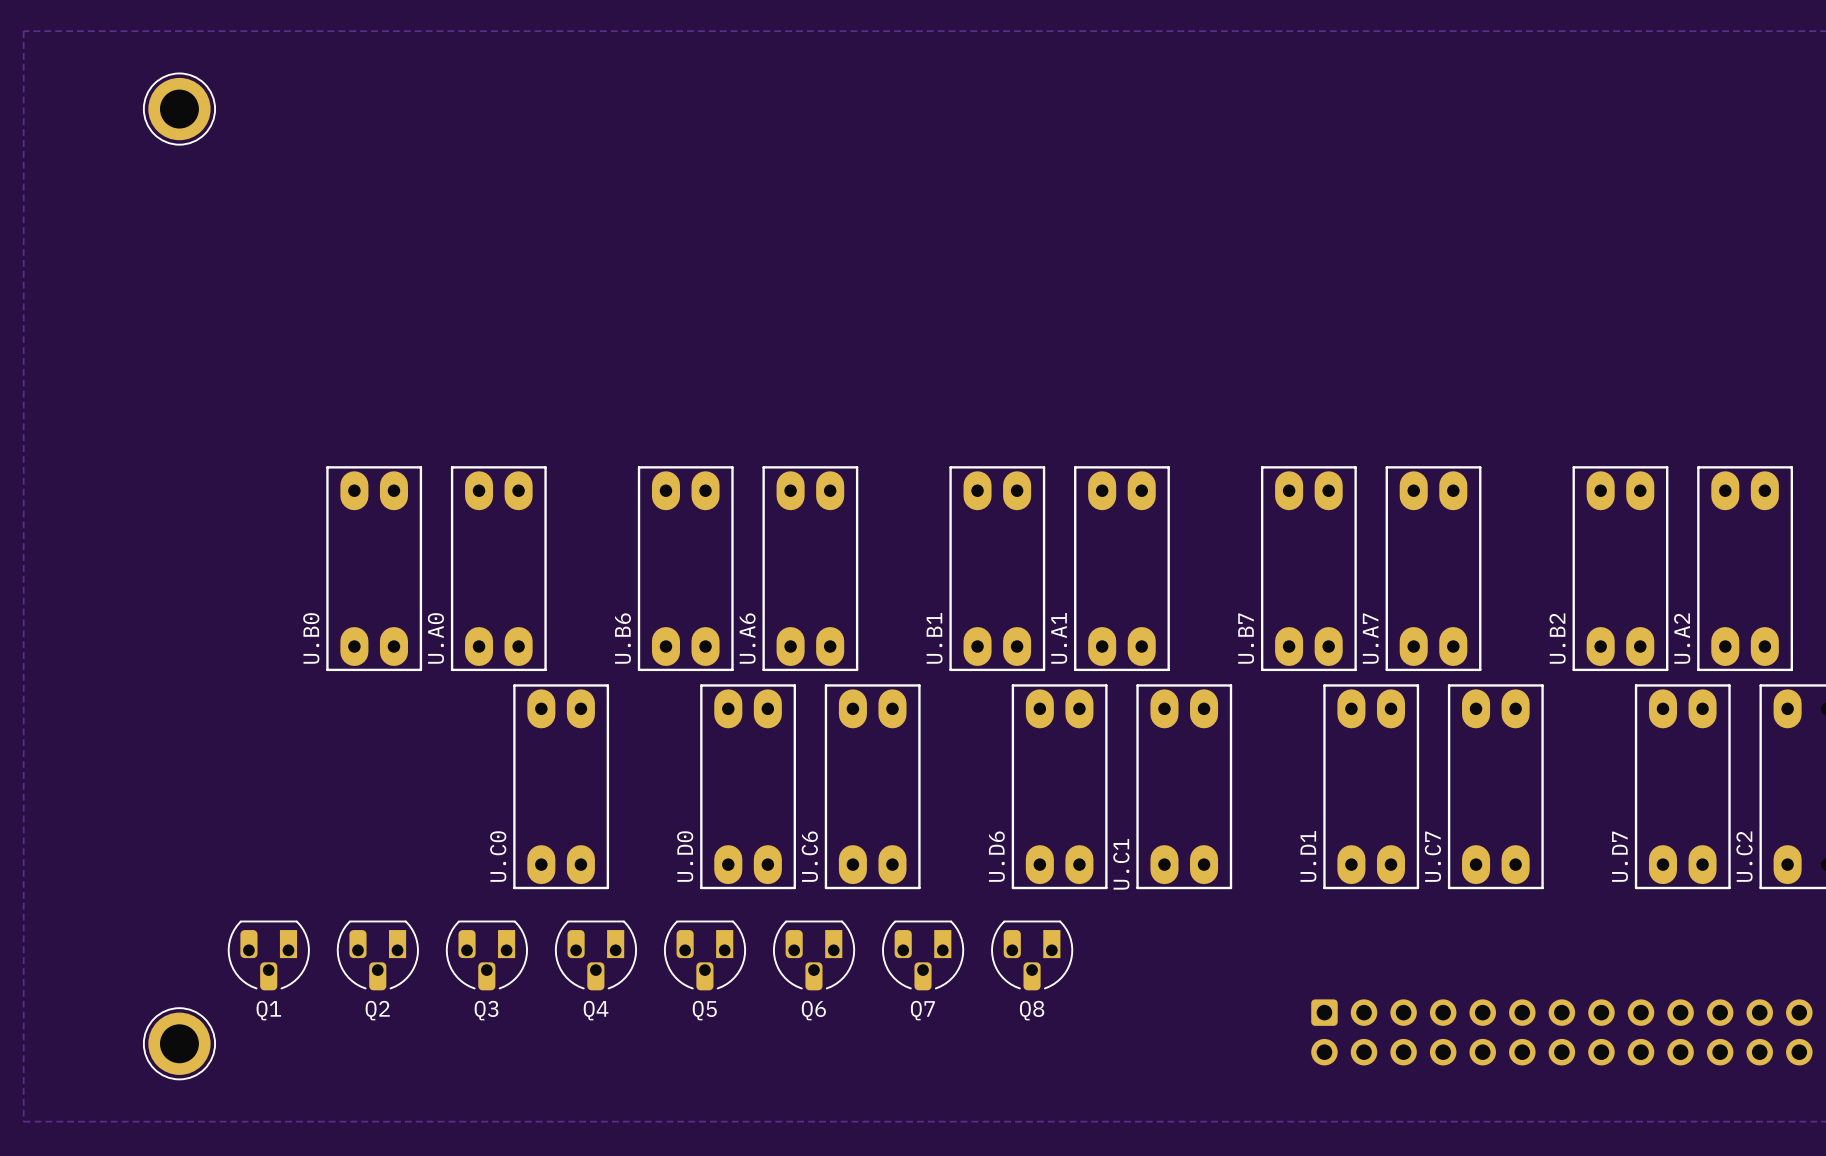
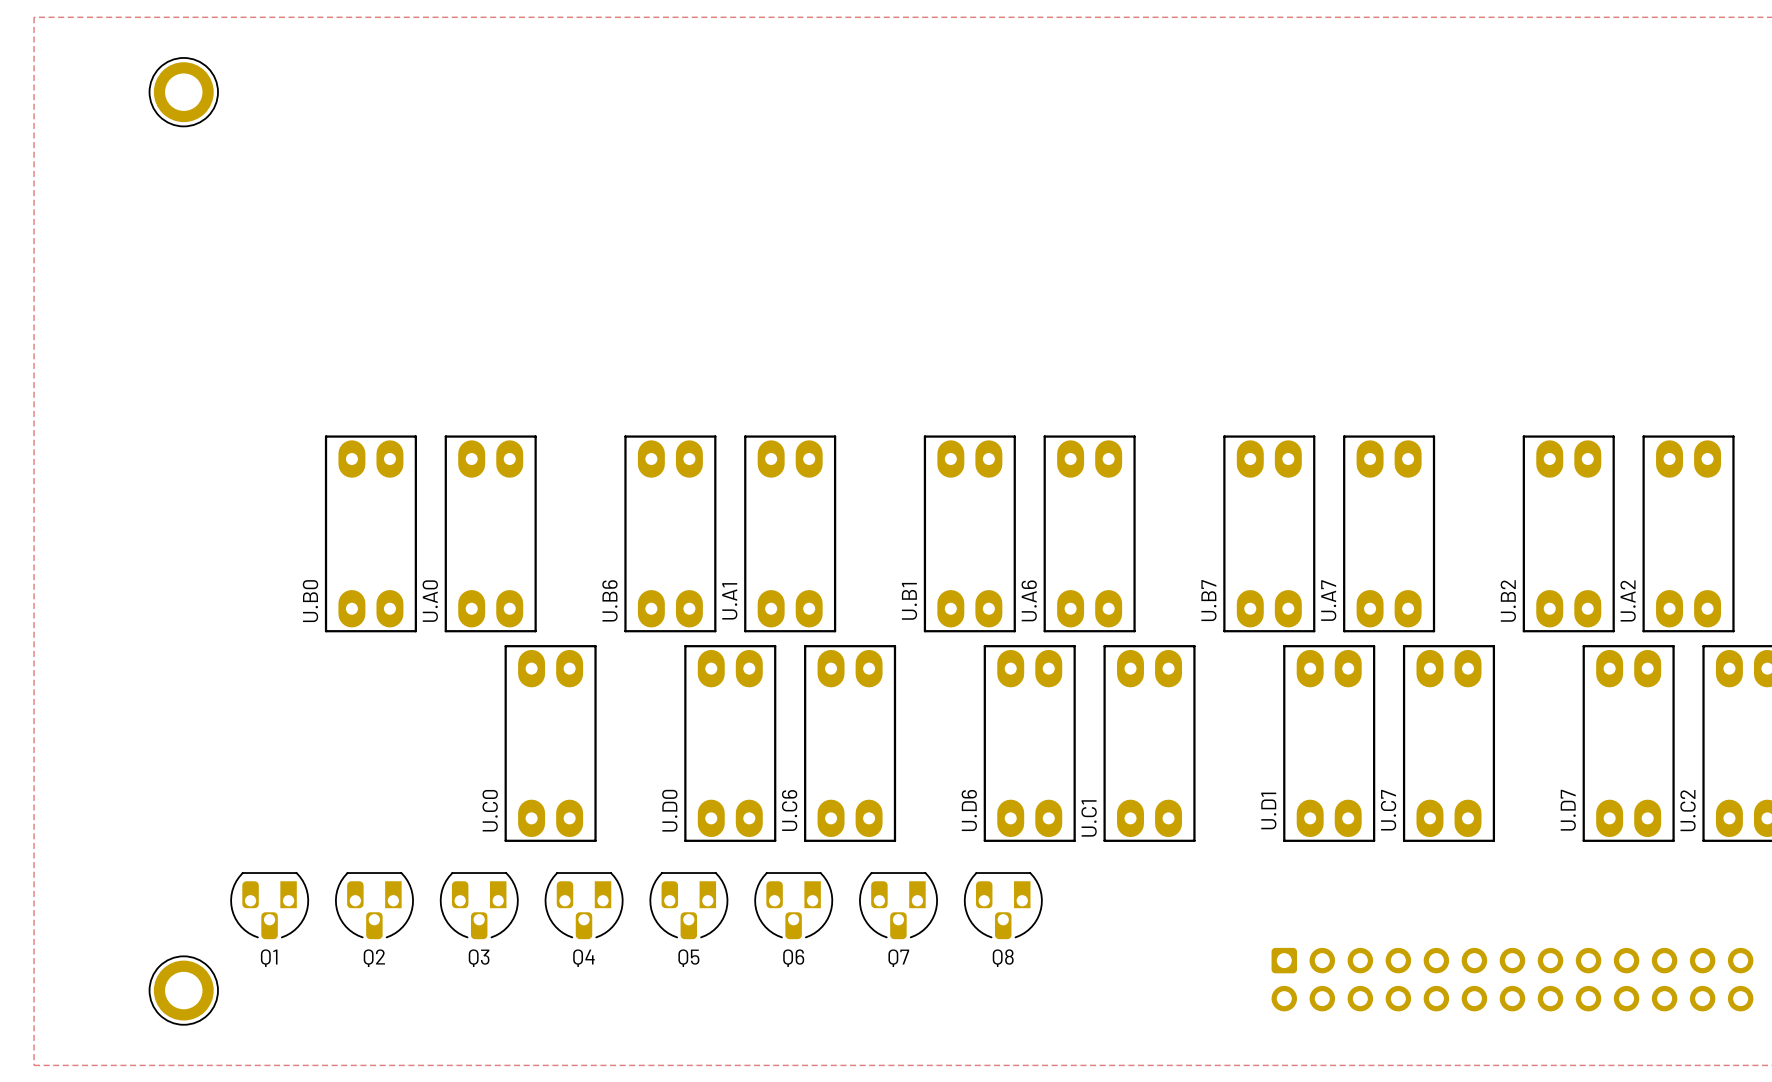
U.A6 name: U.A6 (747, 638) -> U.A1 (729, 601)
U.A1 name: U.A1 (1059, 638) -> U.A6 (1029, 600)

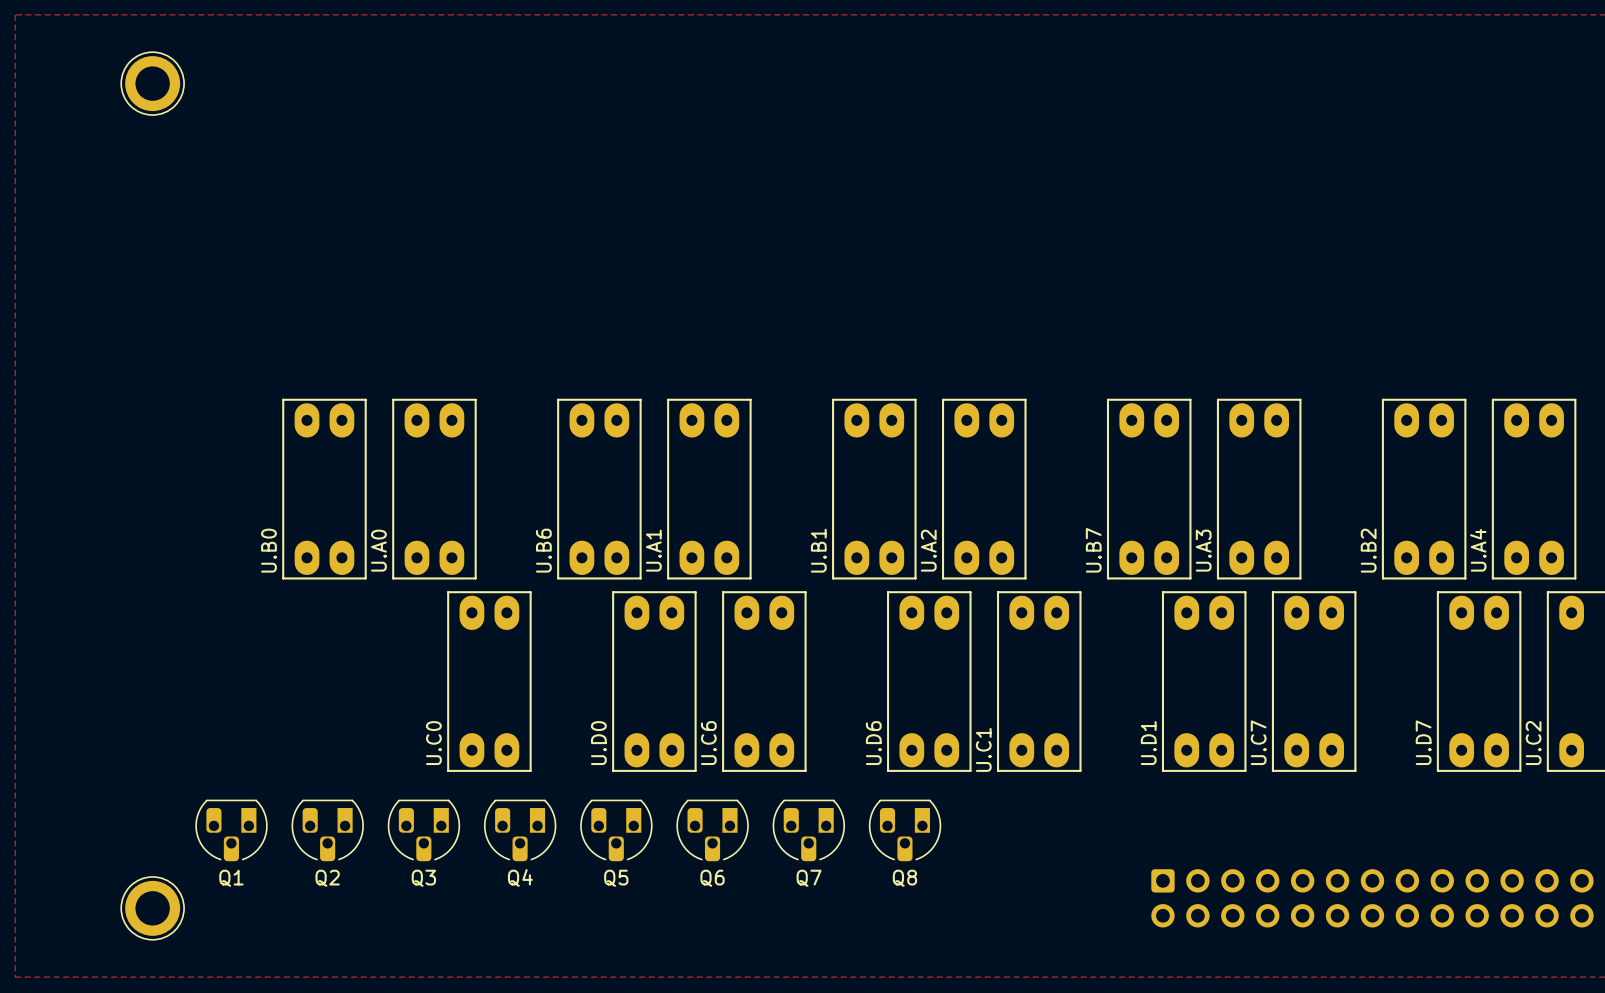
U.A6 name: U.A6 (1029, 600) -> U.A2 (928, 550)
U.A7 name: U.A7 (1328, 600) -> U.A3 (1203, 550)
U.A2 name: U.A2 (1628, 600) -> U.A4 (1478, 550)

